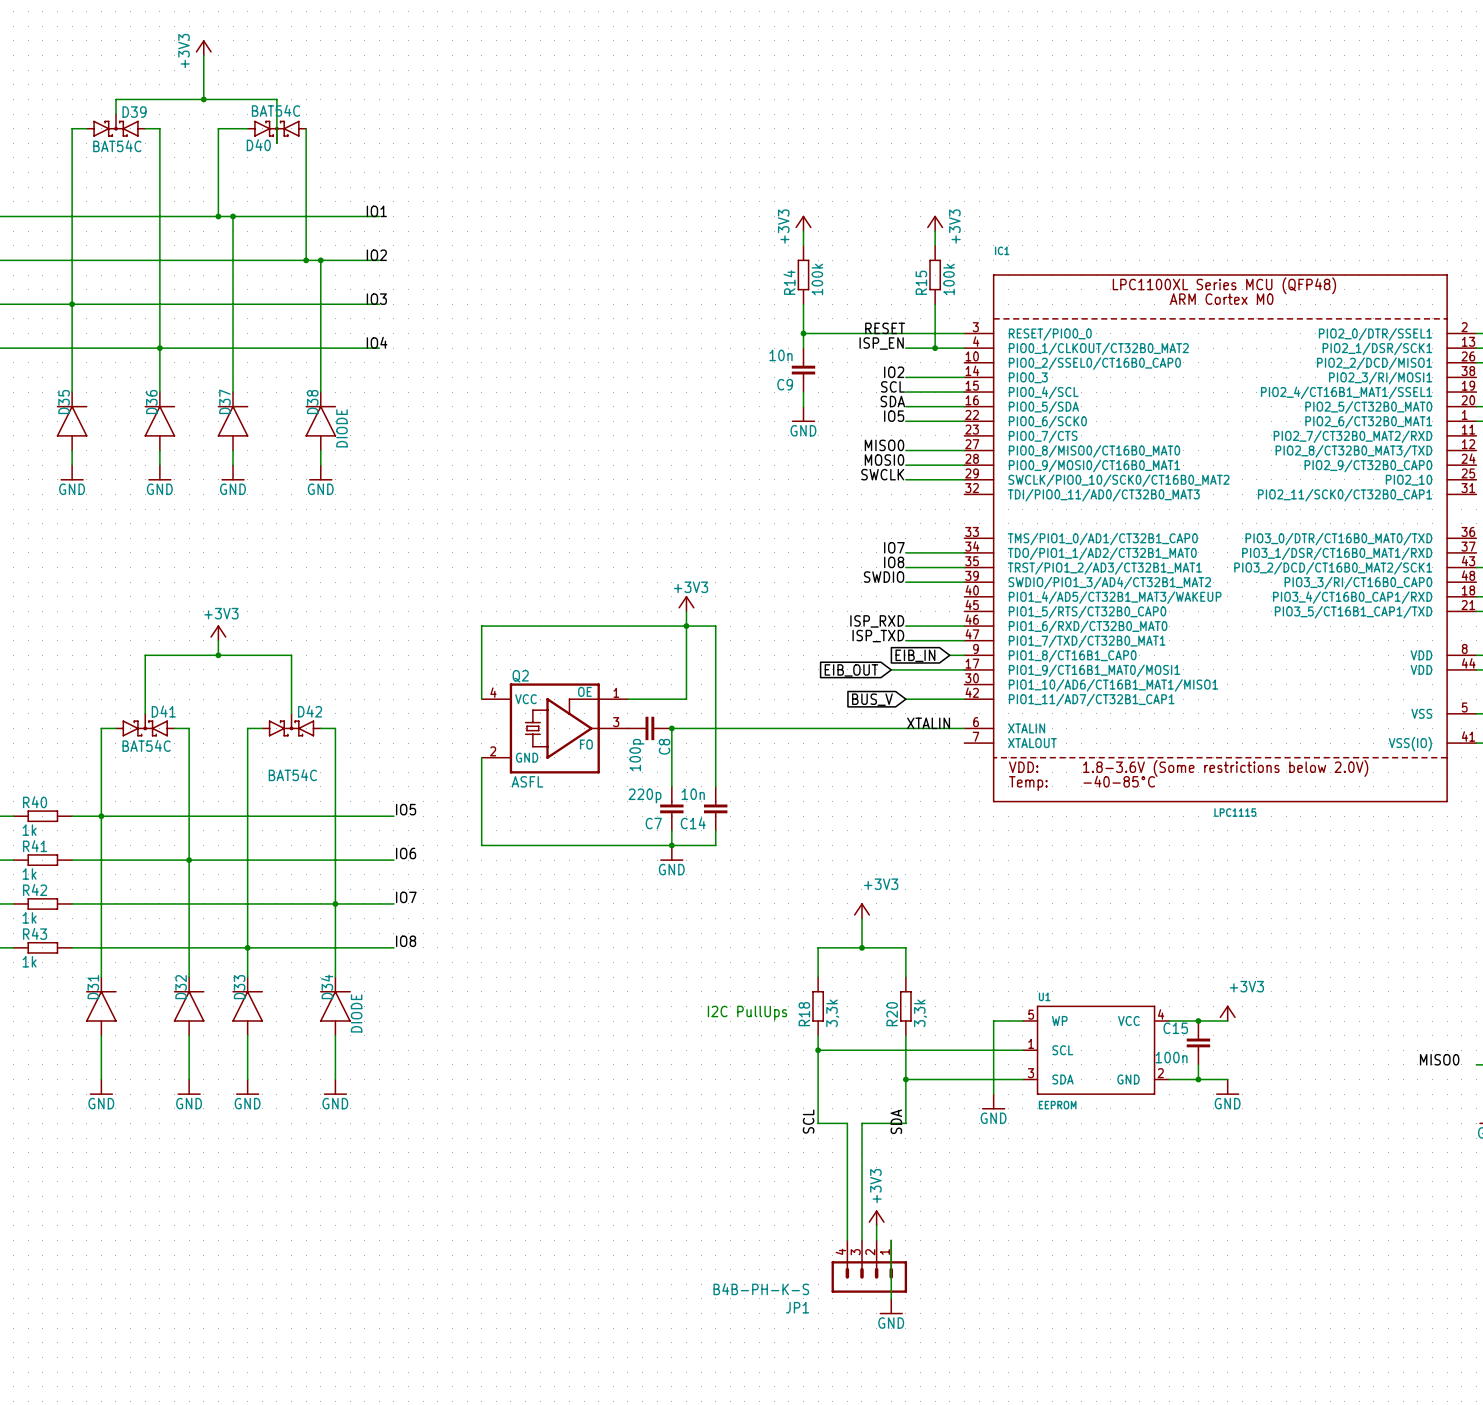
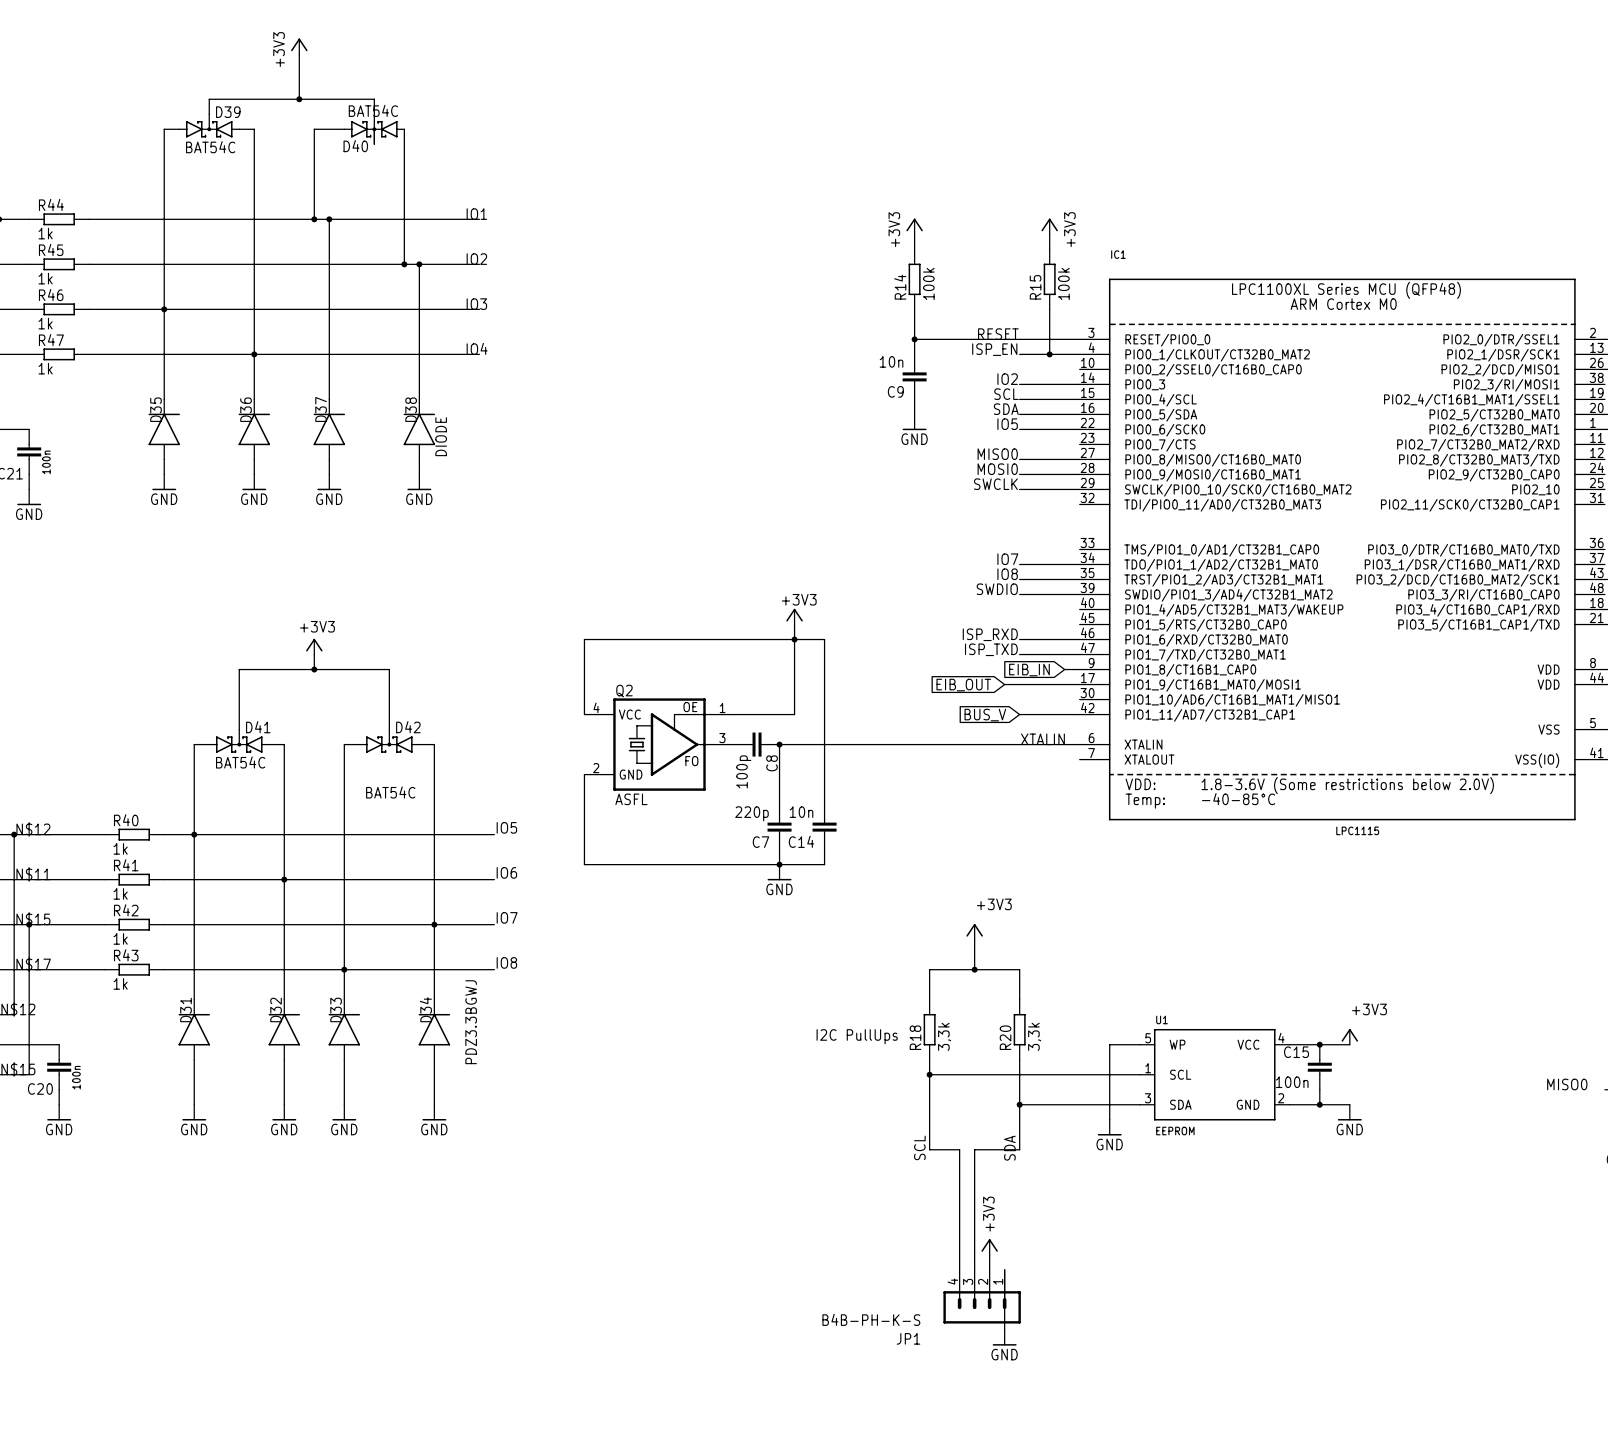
D34 value: DIODE (356, 1013) -> PDZ3.3BGWJ (471, 1022)

